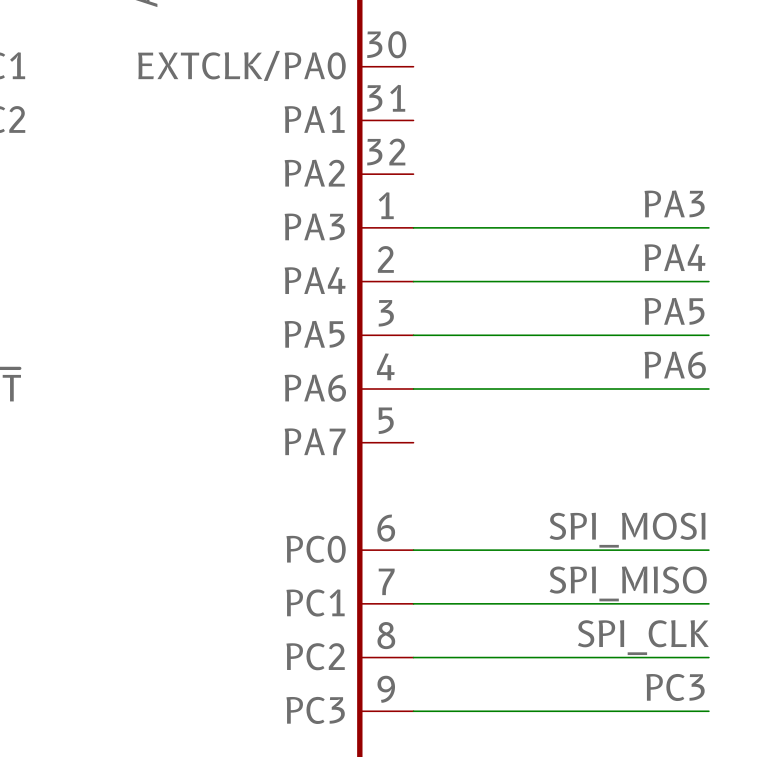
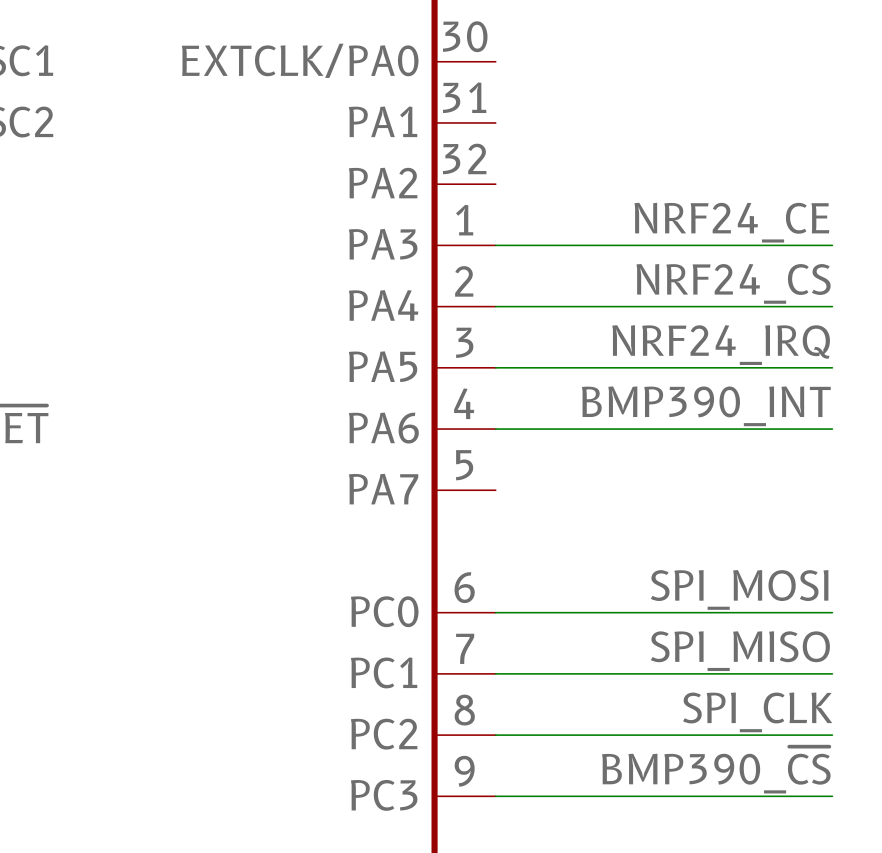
label: PA3 (674, 203) -> NRF24_CE (731, 222)
label: PA4 (674, 257) -> NRF24_CS (733, 283)
label: PA5 (674, 311) -> NRF24_IRQ (721, 345)
label: PA6 (675, 365) -> BMP390_INT (706, 406)
label: PC3 (675, 687) -> BMP390_~{CS} (716, 770)

